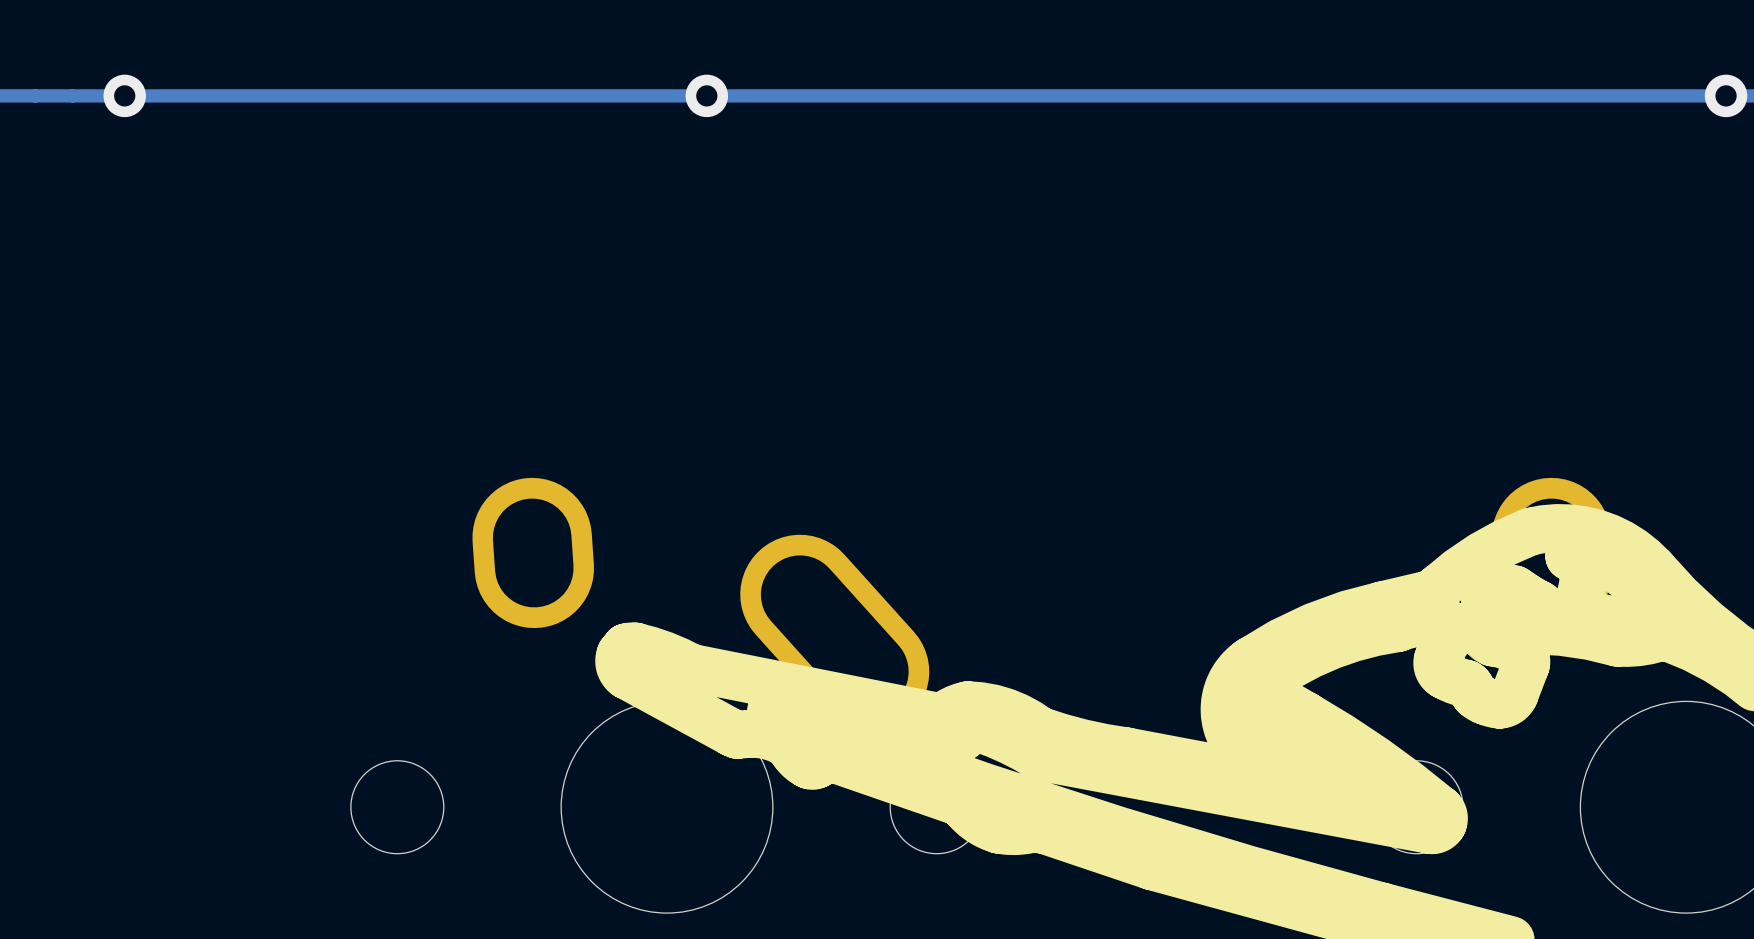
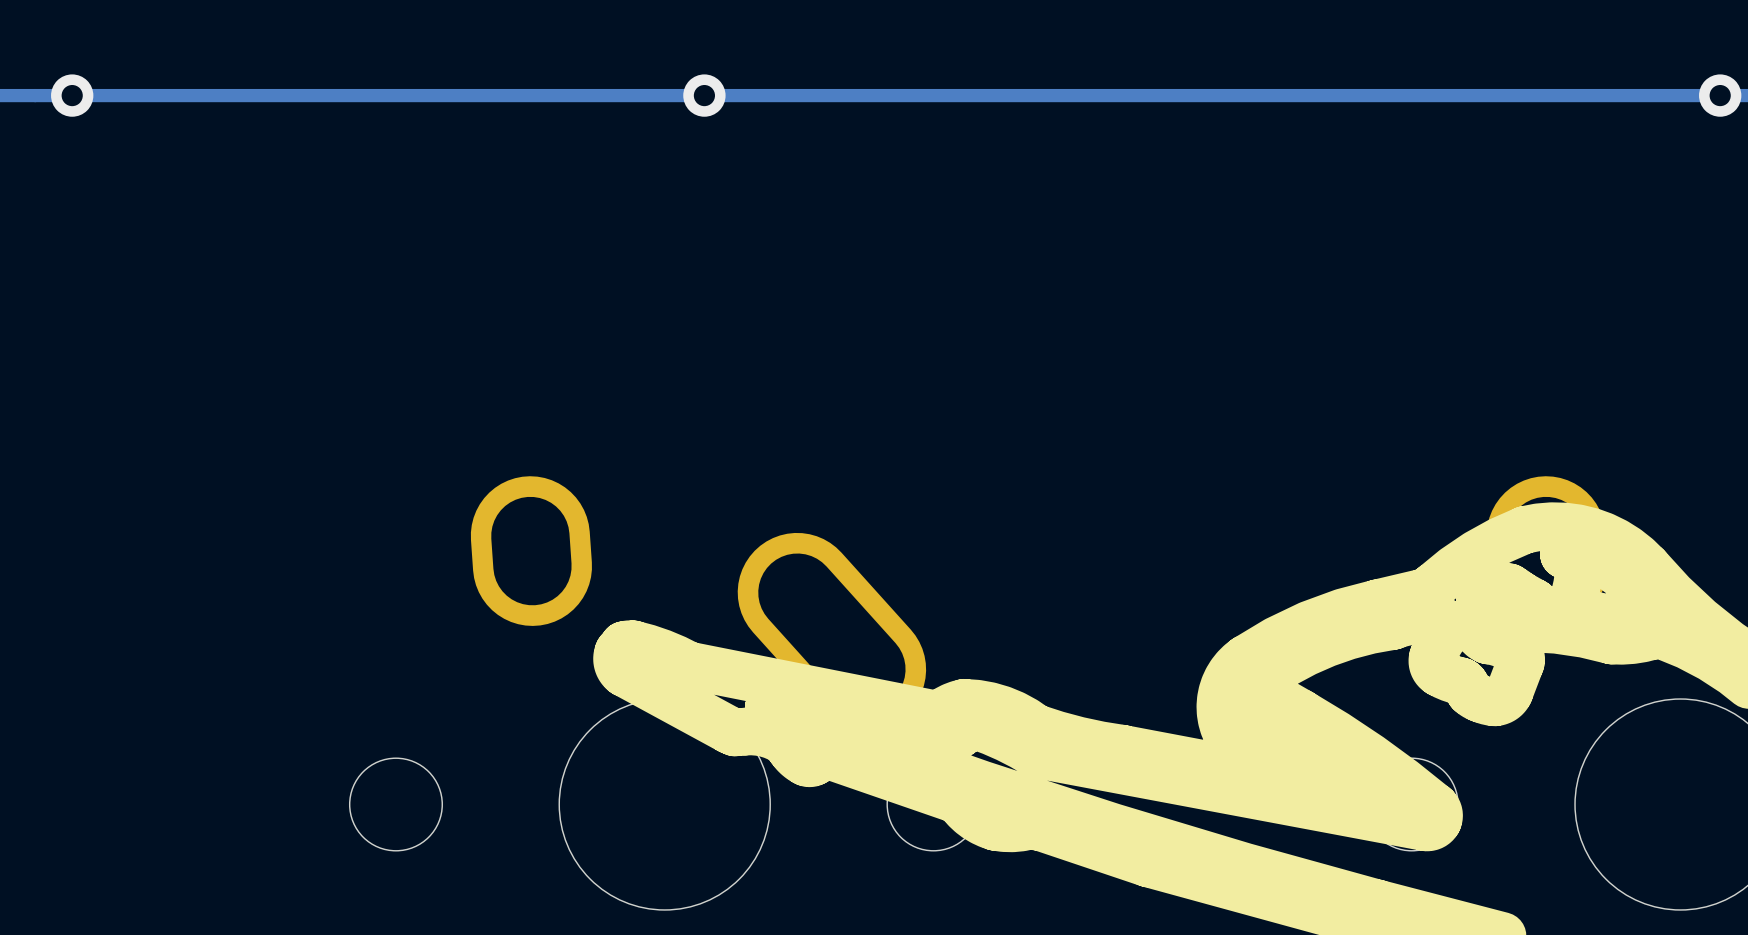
via position: (124, 95) -> (72, 95)

